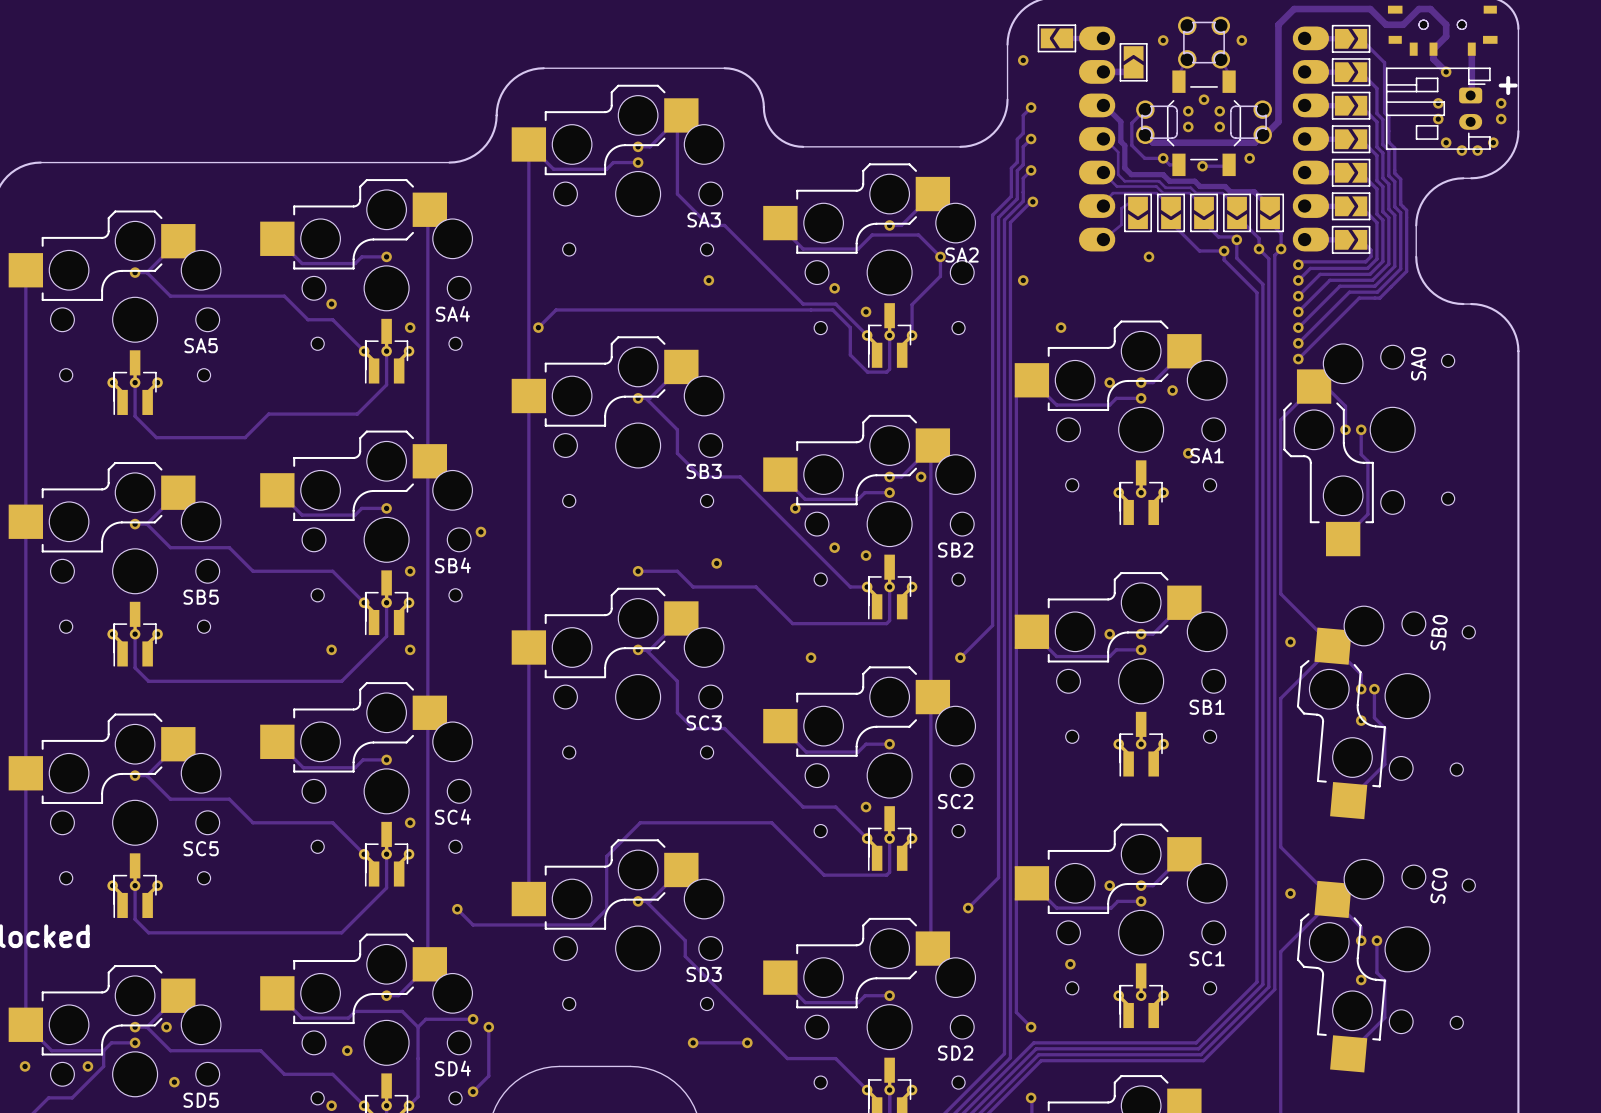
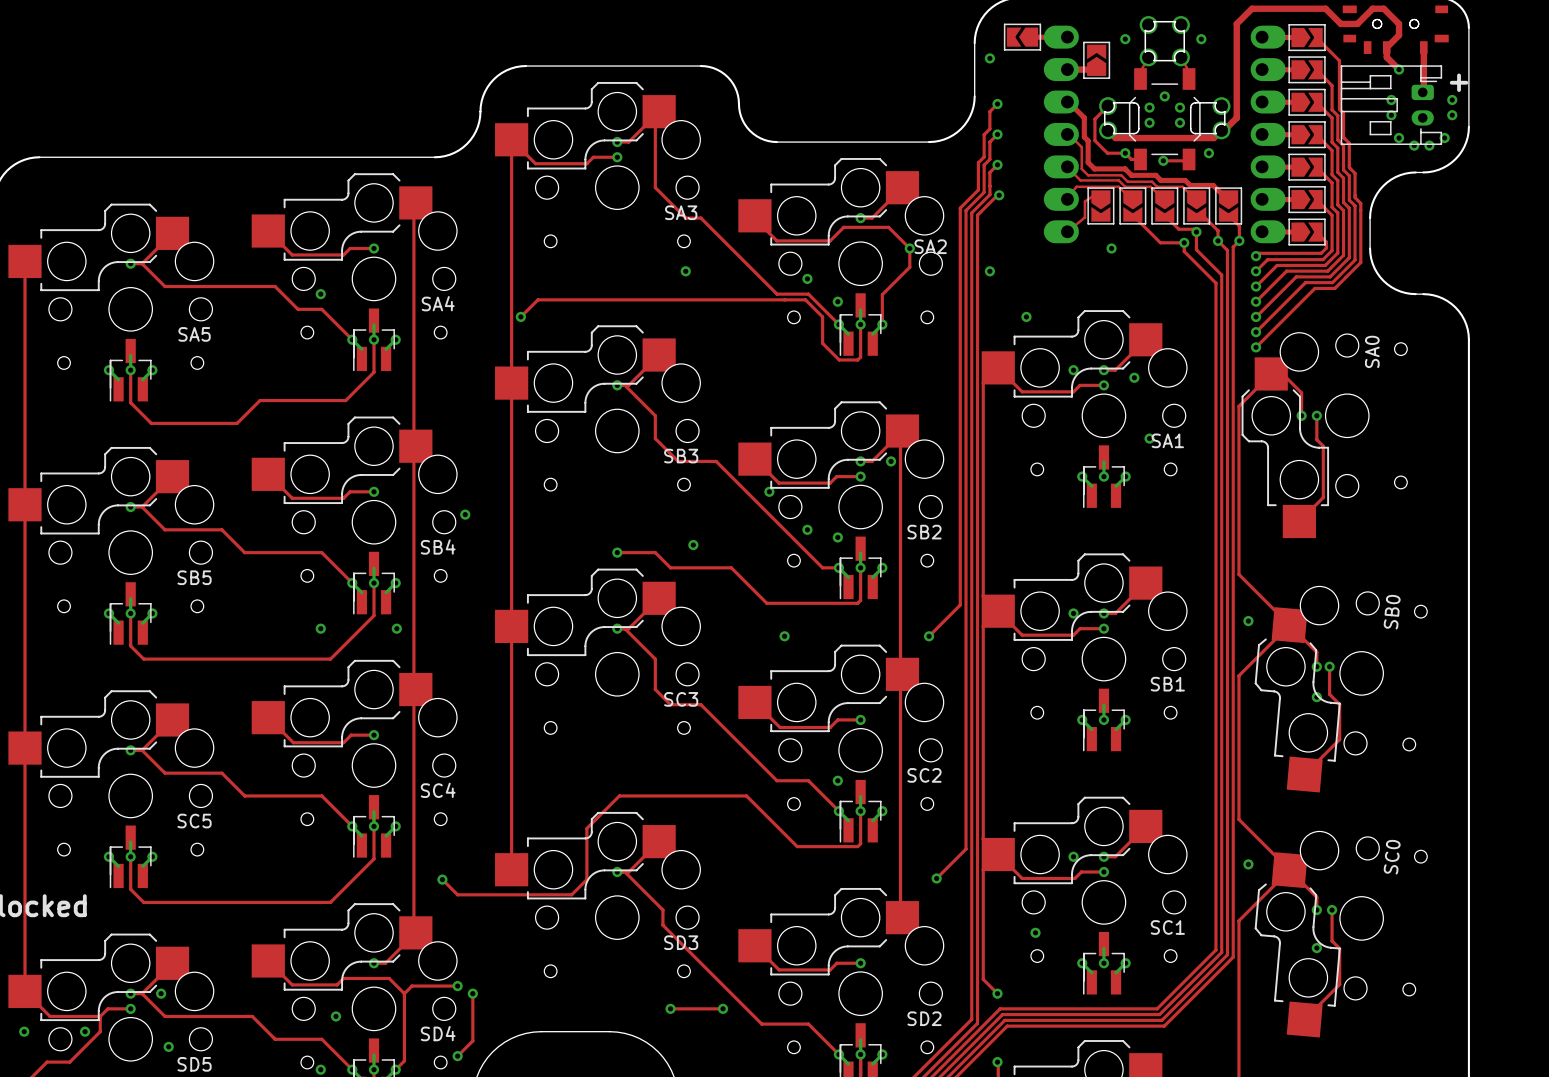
via: (410, 327) -> none
via: (410, 571) -> none
via: (410, 822) -> none

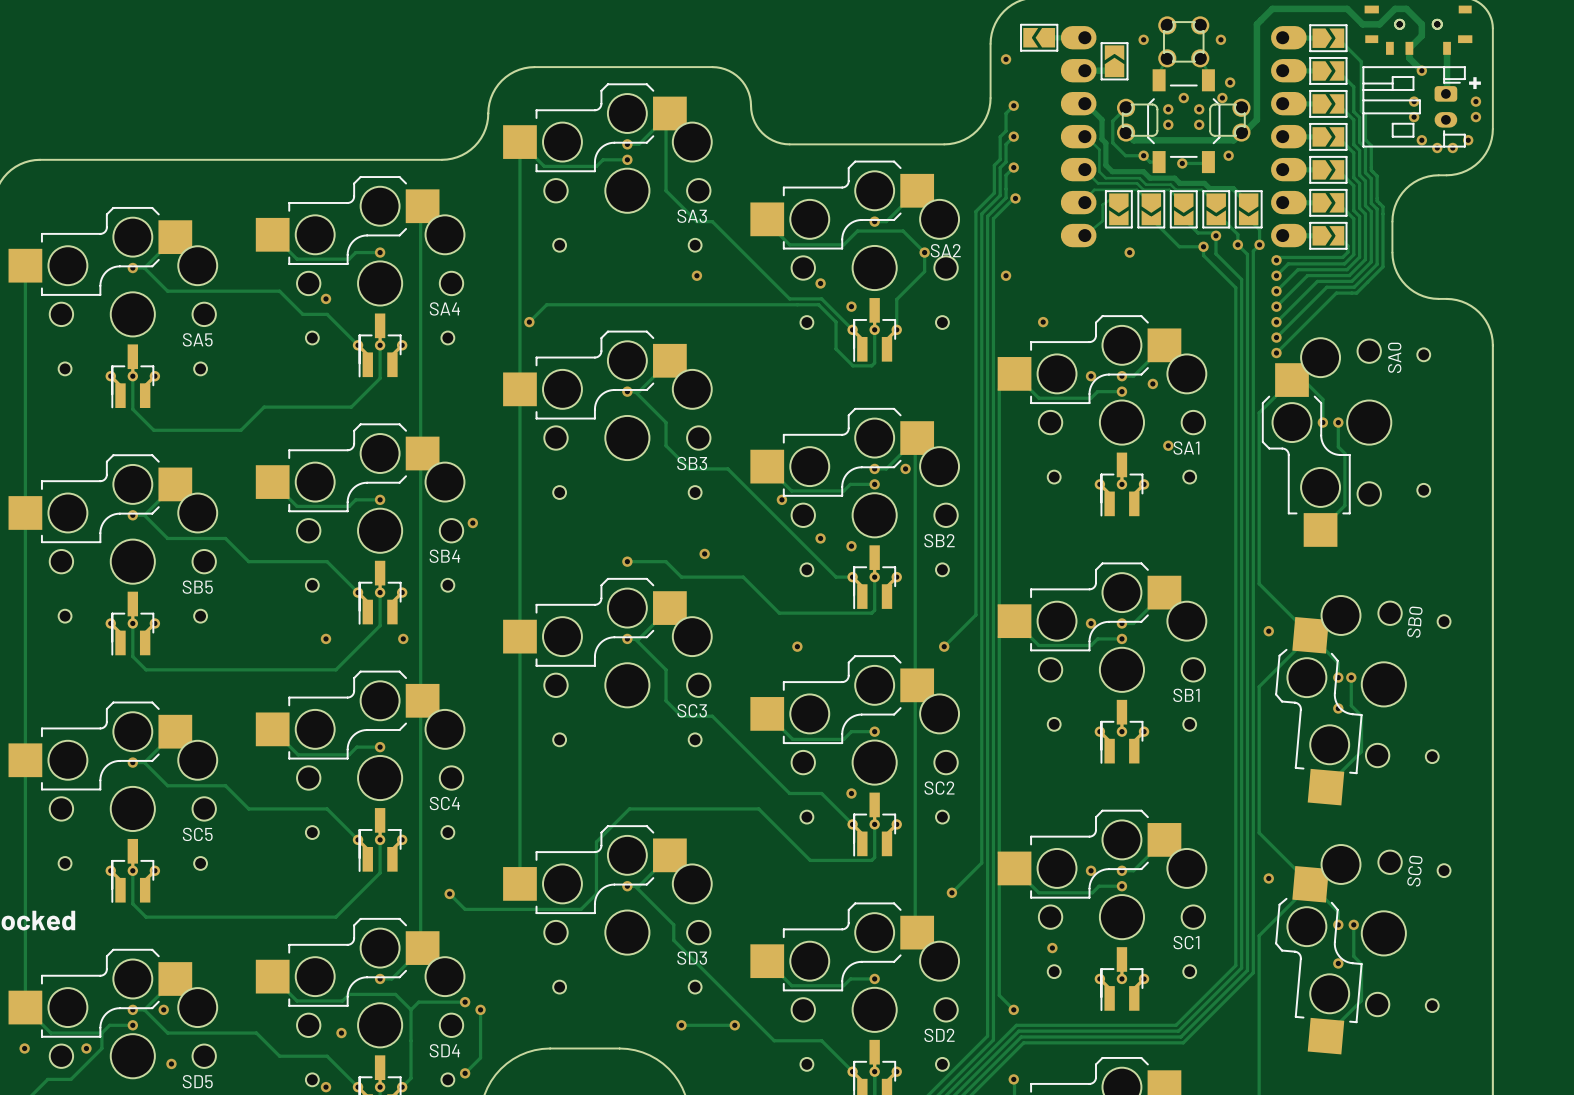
via: none -> (1230, 82)
via: none -> (1222, 98)

